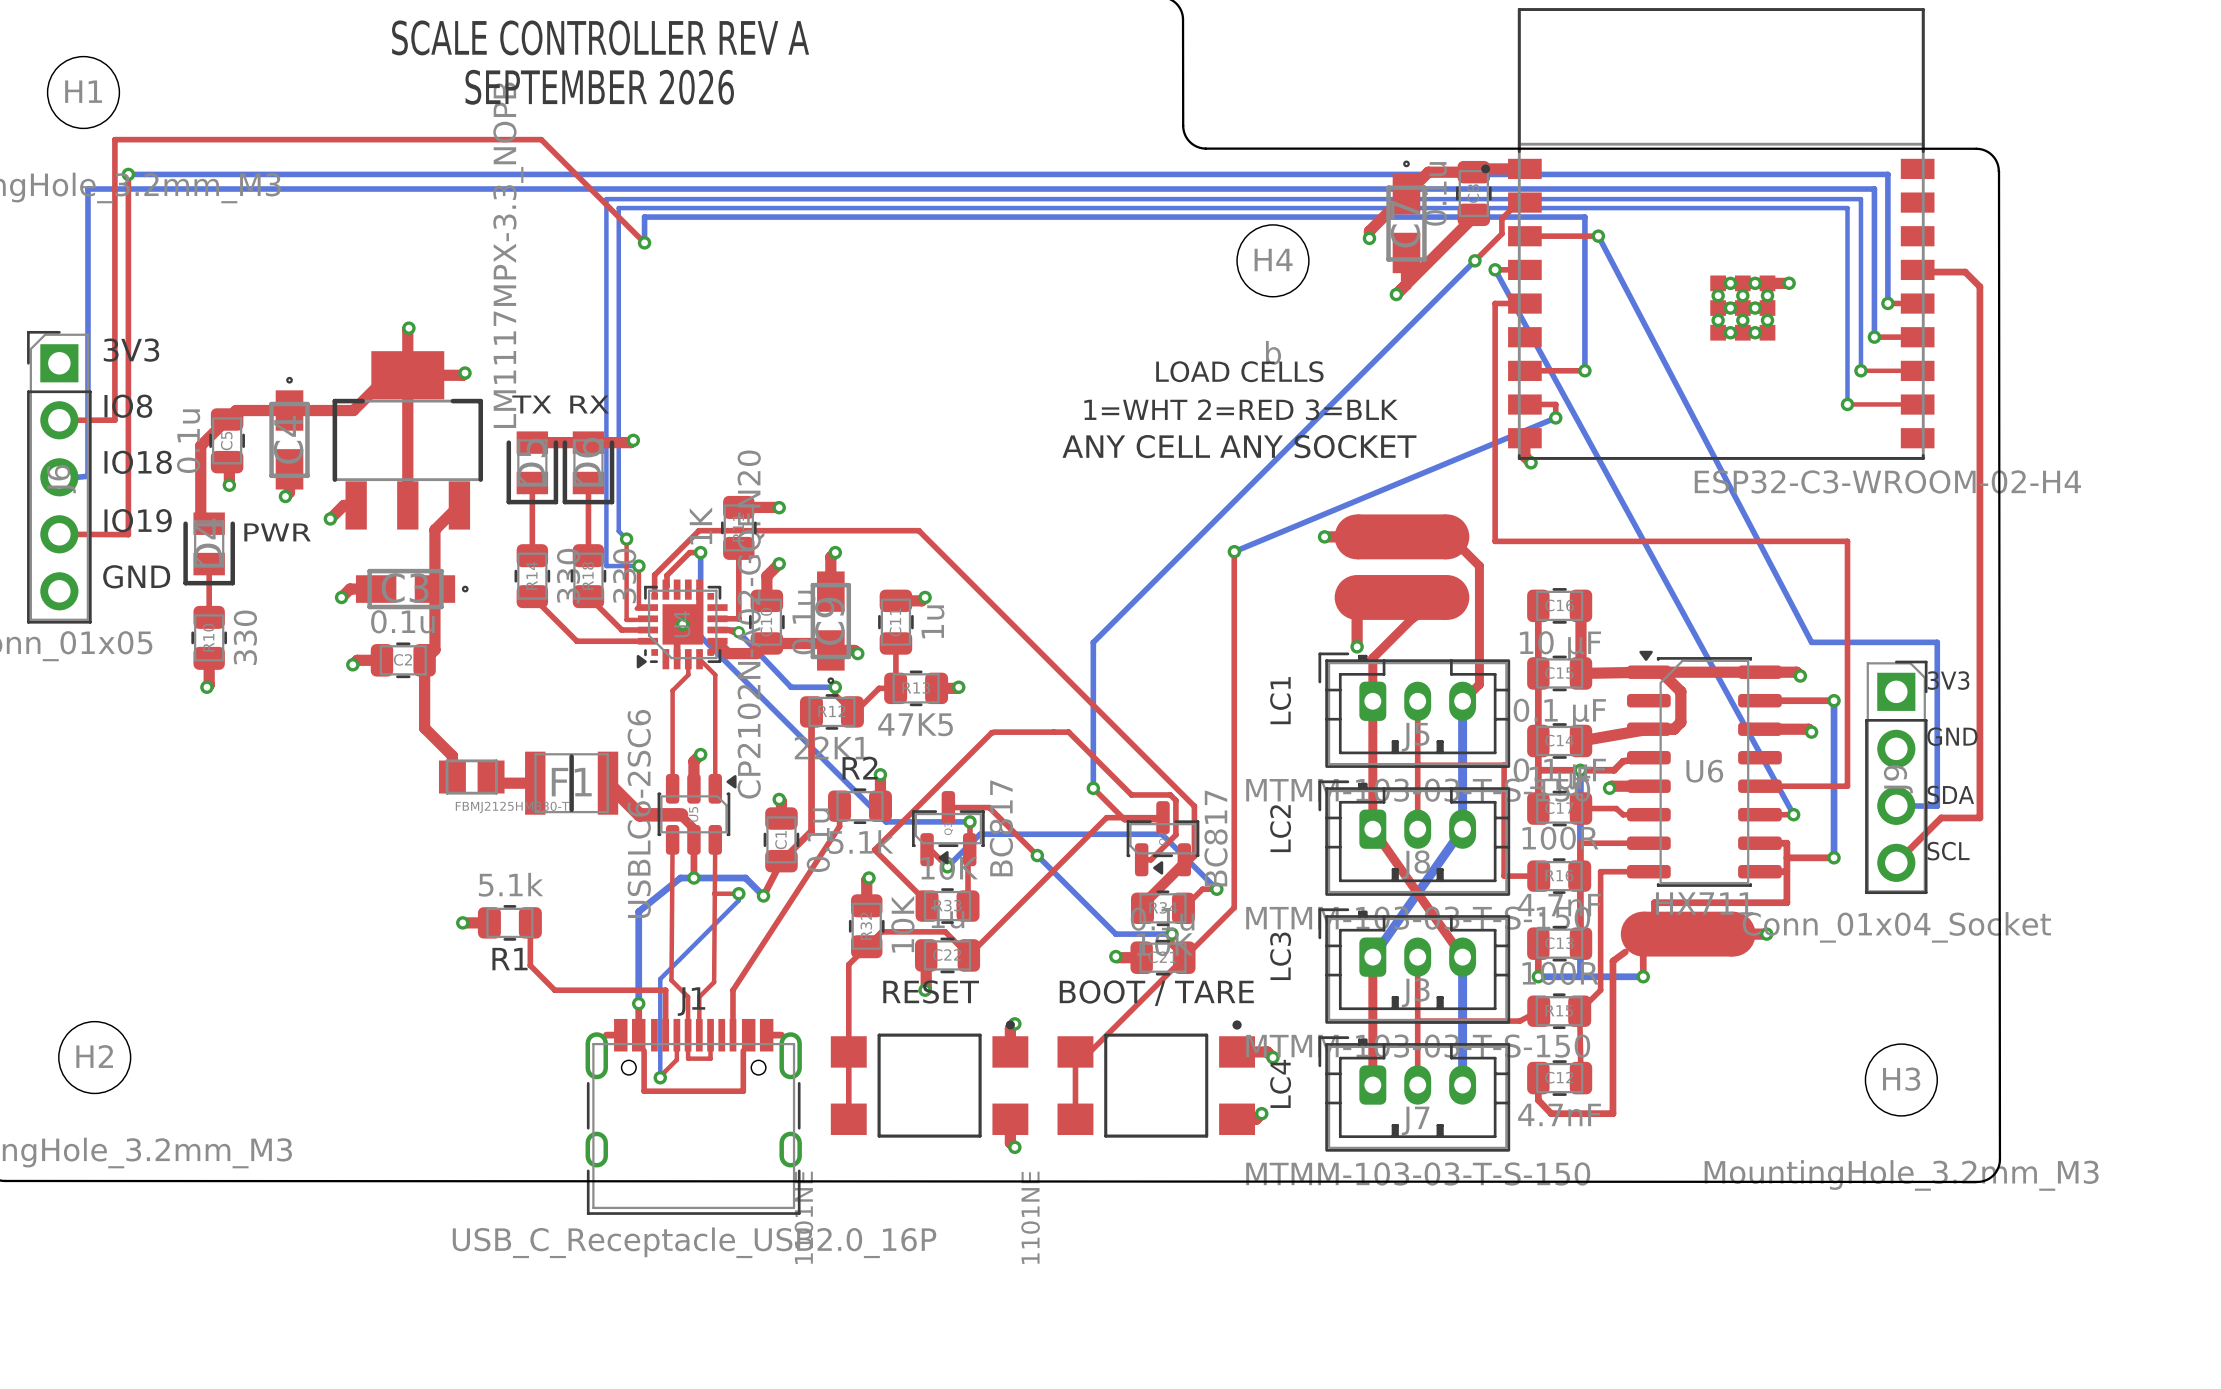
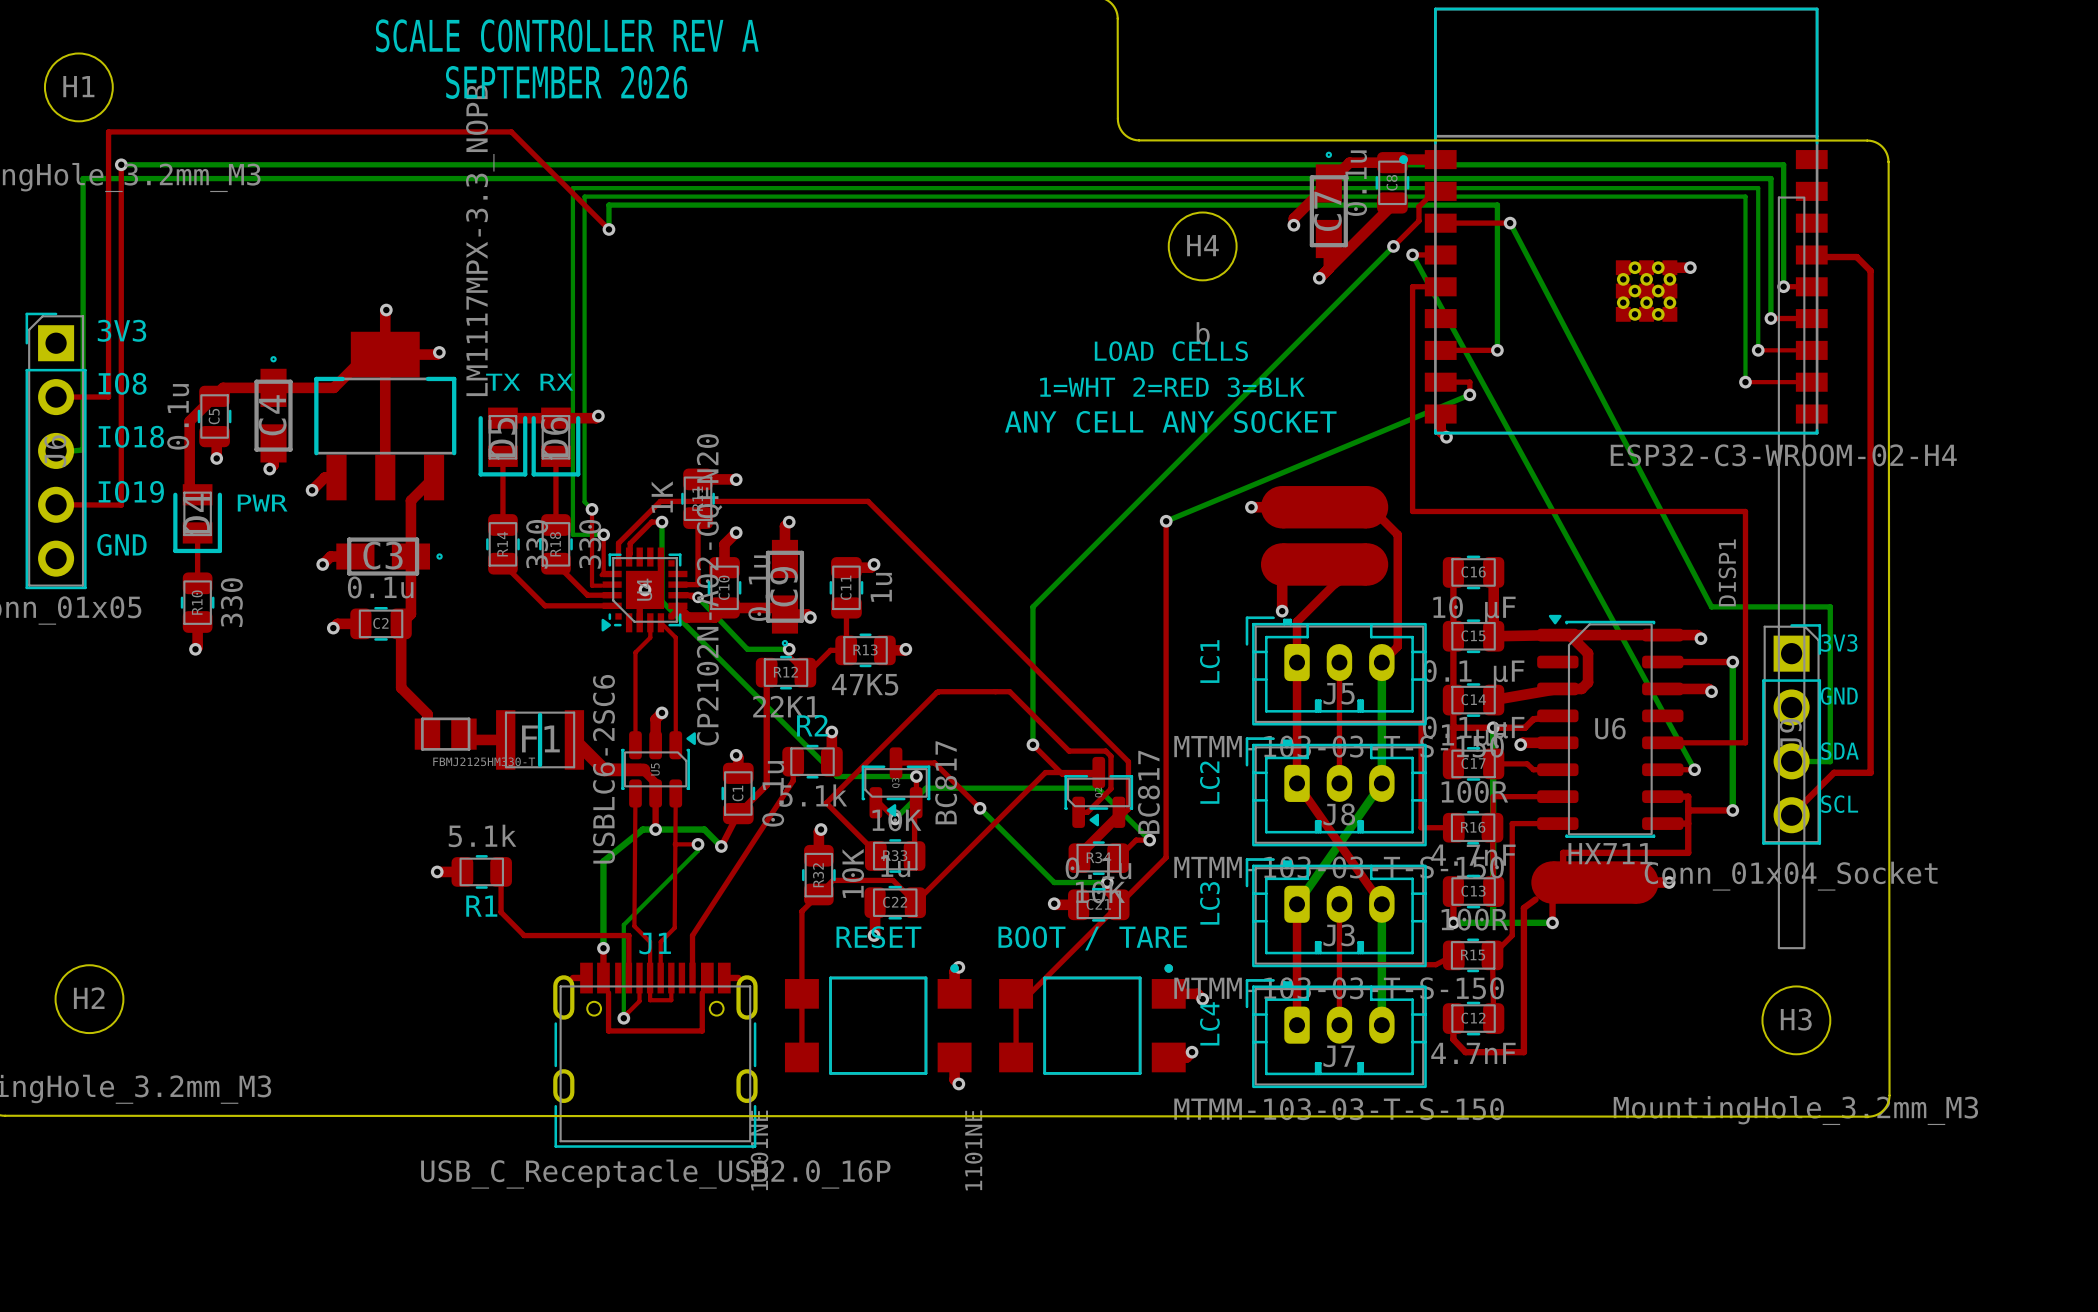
DISP1: none -> (1791, 572)

